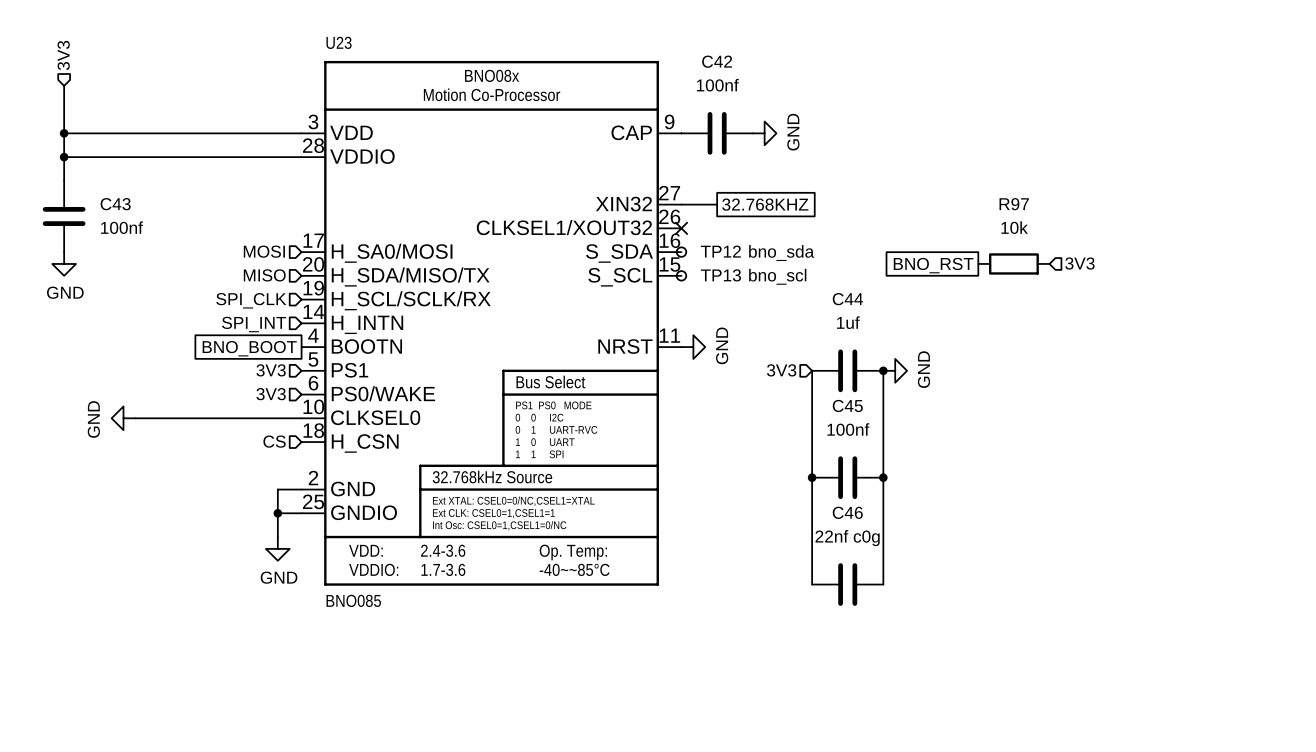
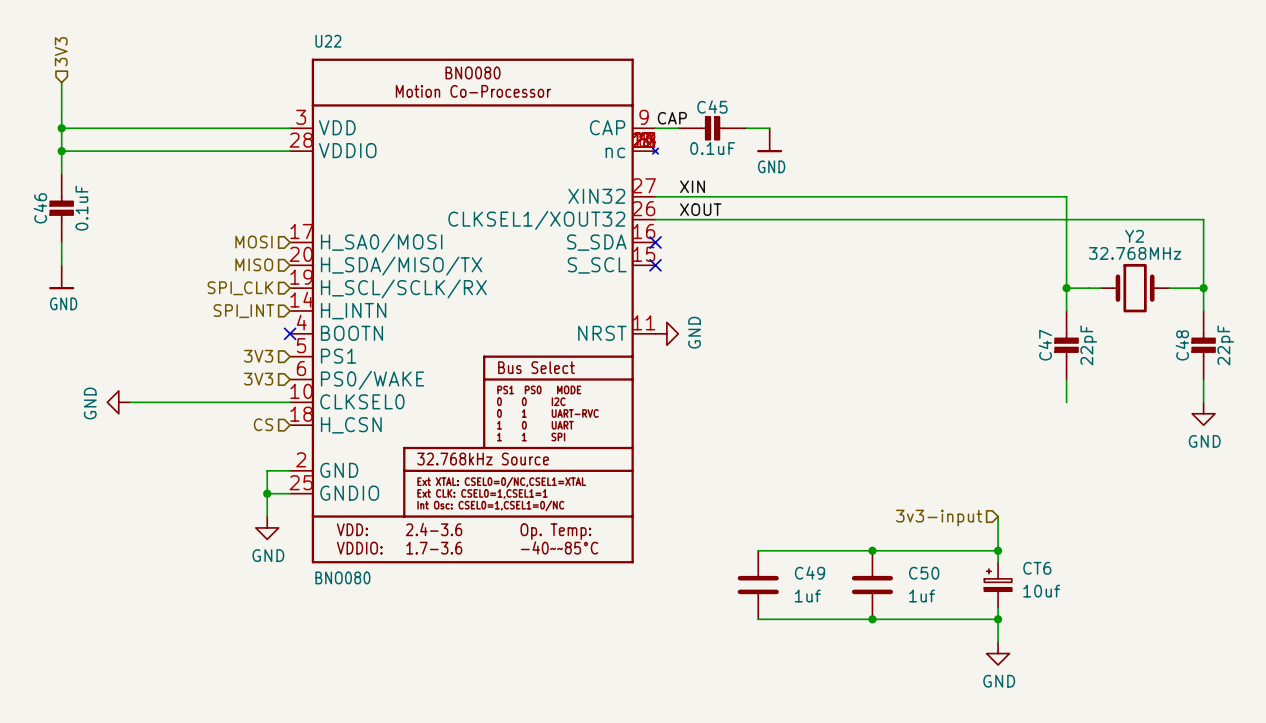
label: none -> CAP (672, 118)
C42: 100nf (717, 133) -> none
power symbol: GND (764, 133) -> none
wire: none -> (746, 128) (769, 128)
power symbol: none -> GND (769, 140)
label: none -> XIN (692, 186)
wire: none -> (689, 196) (1066, 196) (1066, 310)
global label: 32.768KHZ (765, 204) -> none
C43: 100nf (64, 216) -> none
label: none -> XOUT (700, 209)
wire: none -> (655, 219) (1203, 219) (1203, 310)
no-connect mark: (681, 228) -> none
no-connect mark: none -> (655, 242)
TP12: bno_sda (681, 252) -> none
power symbol: GND (64, 263) -> none
R97: 10k (1013, 263) -> none
hierarchical label: 3V3 (1079, 263) -> none
global label: BNO_RST (933, 265) -> none
no-connect mark: none -> (655, 265)
TP13: bno_scl (681, 275) -> none
power symbol: none -> GND (61, 277)
wire: none -> (1066, 288) (1100, 288)
junction: none -> (1066, 288)
Y2: none -> 32.768MHz (1135, 288)
wire: none -> (1169, 288) (1203, 288)
junction: none -> (1203, 288)
U23: BNO085 (491, 323) -> none
U22: none -> BNO080 (474, 310)
no-connect mark: none -> (290, 333)
global label: BNO_BOOT (249, 348) -> none
C47: none -> 22pF (1066, 345)
C48: none -> 22pF (1203, 345)
hierarchical label: 3V3 (781, 370) -> none
wire: (812, 370) (812, 584) -> none
C44: 1uf (847, 370) -> none
wire: (883, 370) (883, 584) -> none
junction: (883, 370) -> none
power symbol: GND (895, 370) -> none
wire: none -> (1066, 379) (1066, 402)
wire: none -> (1203, 379) (1203, 402)
C45 name position: C45 (847, 405) -> C45 (712, 106)
C45 value: 100nf (848, 429) -> 0.1uF (712, 148)
power symbol: none -> GND (1203, 413)
C45 symbol: [812, 456, 884, 500] -> [678, 116, 747, 140]
junction: (812, 477) -> none
junction: (883, 477) -> none
C46 name position: C46 (847, 512) -> C46 (40, 208)
wire: none -> (998, 516) (998, 562)
C46 value: 22nf c0g (847, 538) -> 0.1uF (81, 208)
hierarchical label: none -> 3v3-input (939, 518)
C46 symbol: [812, 563, 884, 606] -> [50, 173, 74, 243]
wire: none -> (758, 550) (998, 550)
junction: none -> (872, 550)
junction: none -> (998, 550)
C49: none -> 1uf (758, 585)
C50: none -> 1uf (872, 585)
CT6: none -> 10uf (998, 585)
wire: none -> (998, 607) (998, 642)
wire: none -> (758, 619) (998, 619)
junction: none -> (872, 619)
junction: none -> (998, 619)
power symbol: none -> GND (998, 653)

